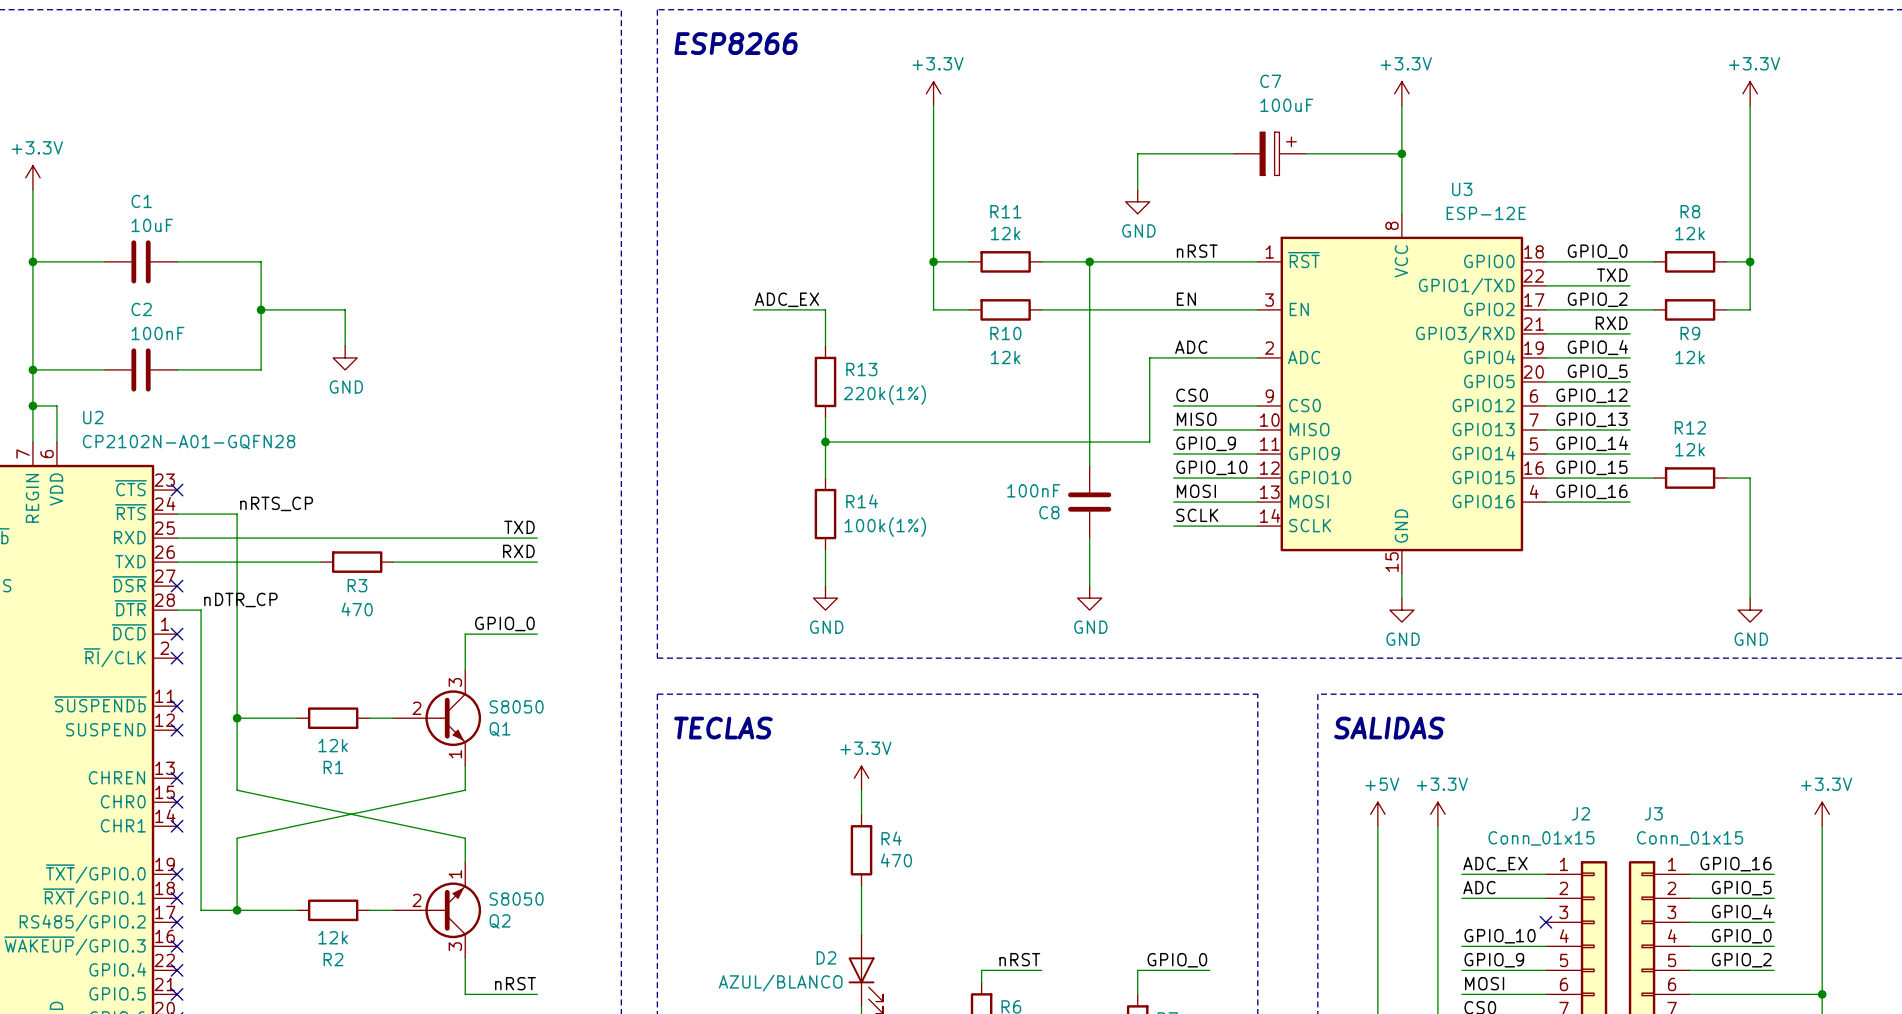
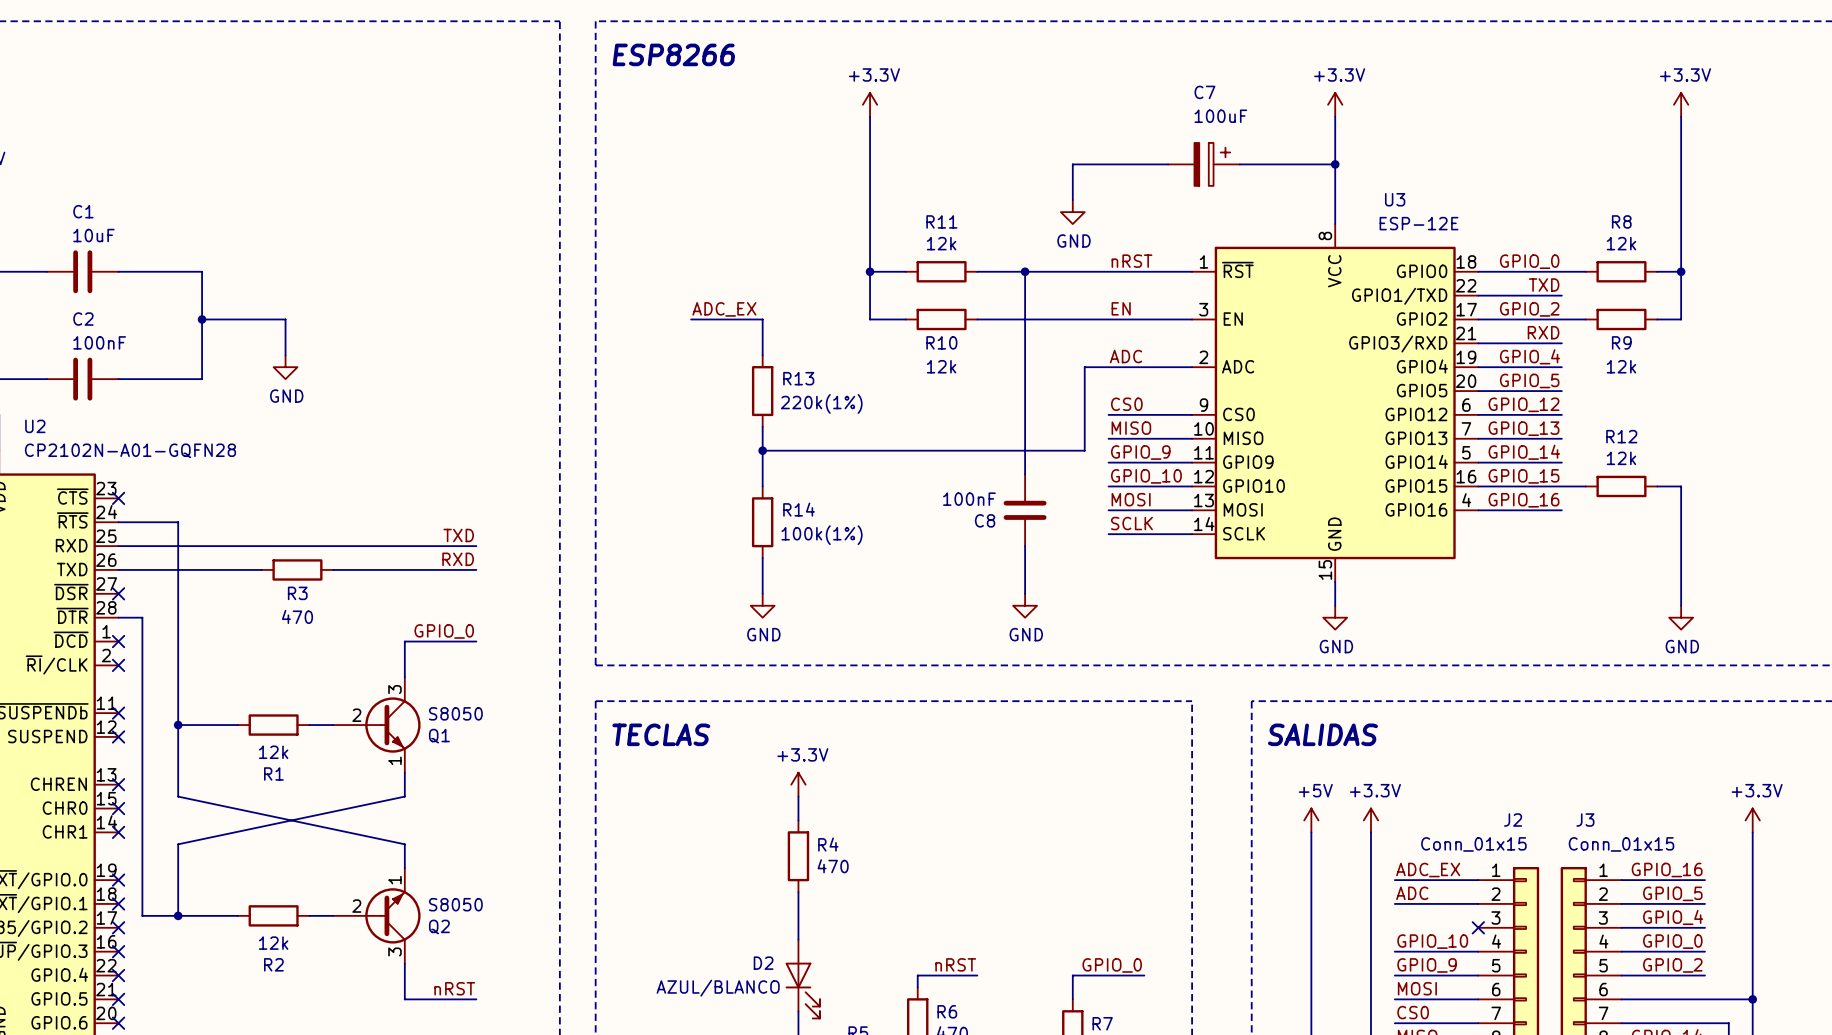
label: nRTS_CP (276, 503) -> none
label: nDTR_CP (240, 599) -> none

